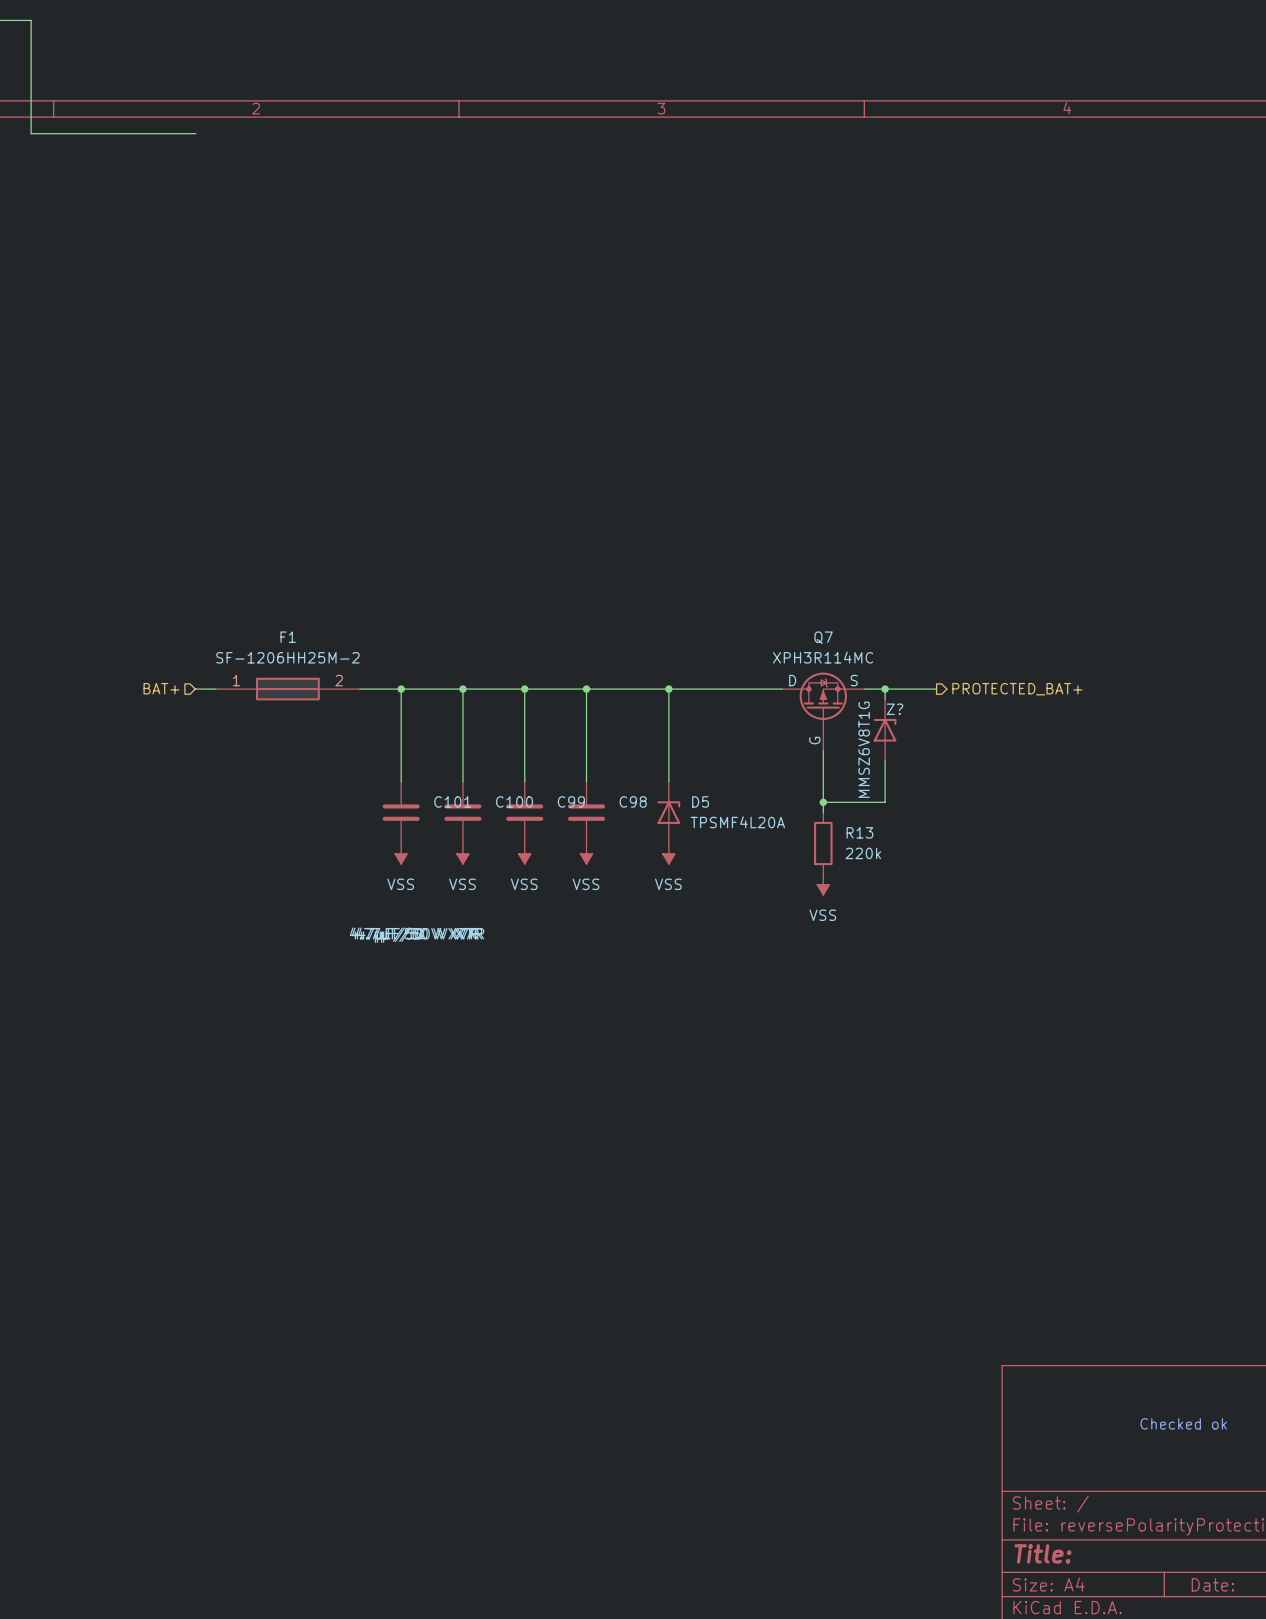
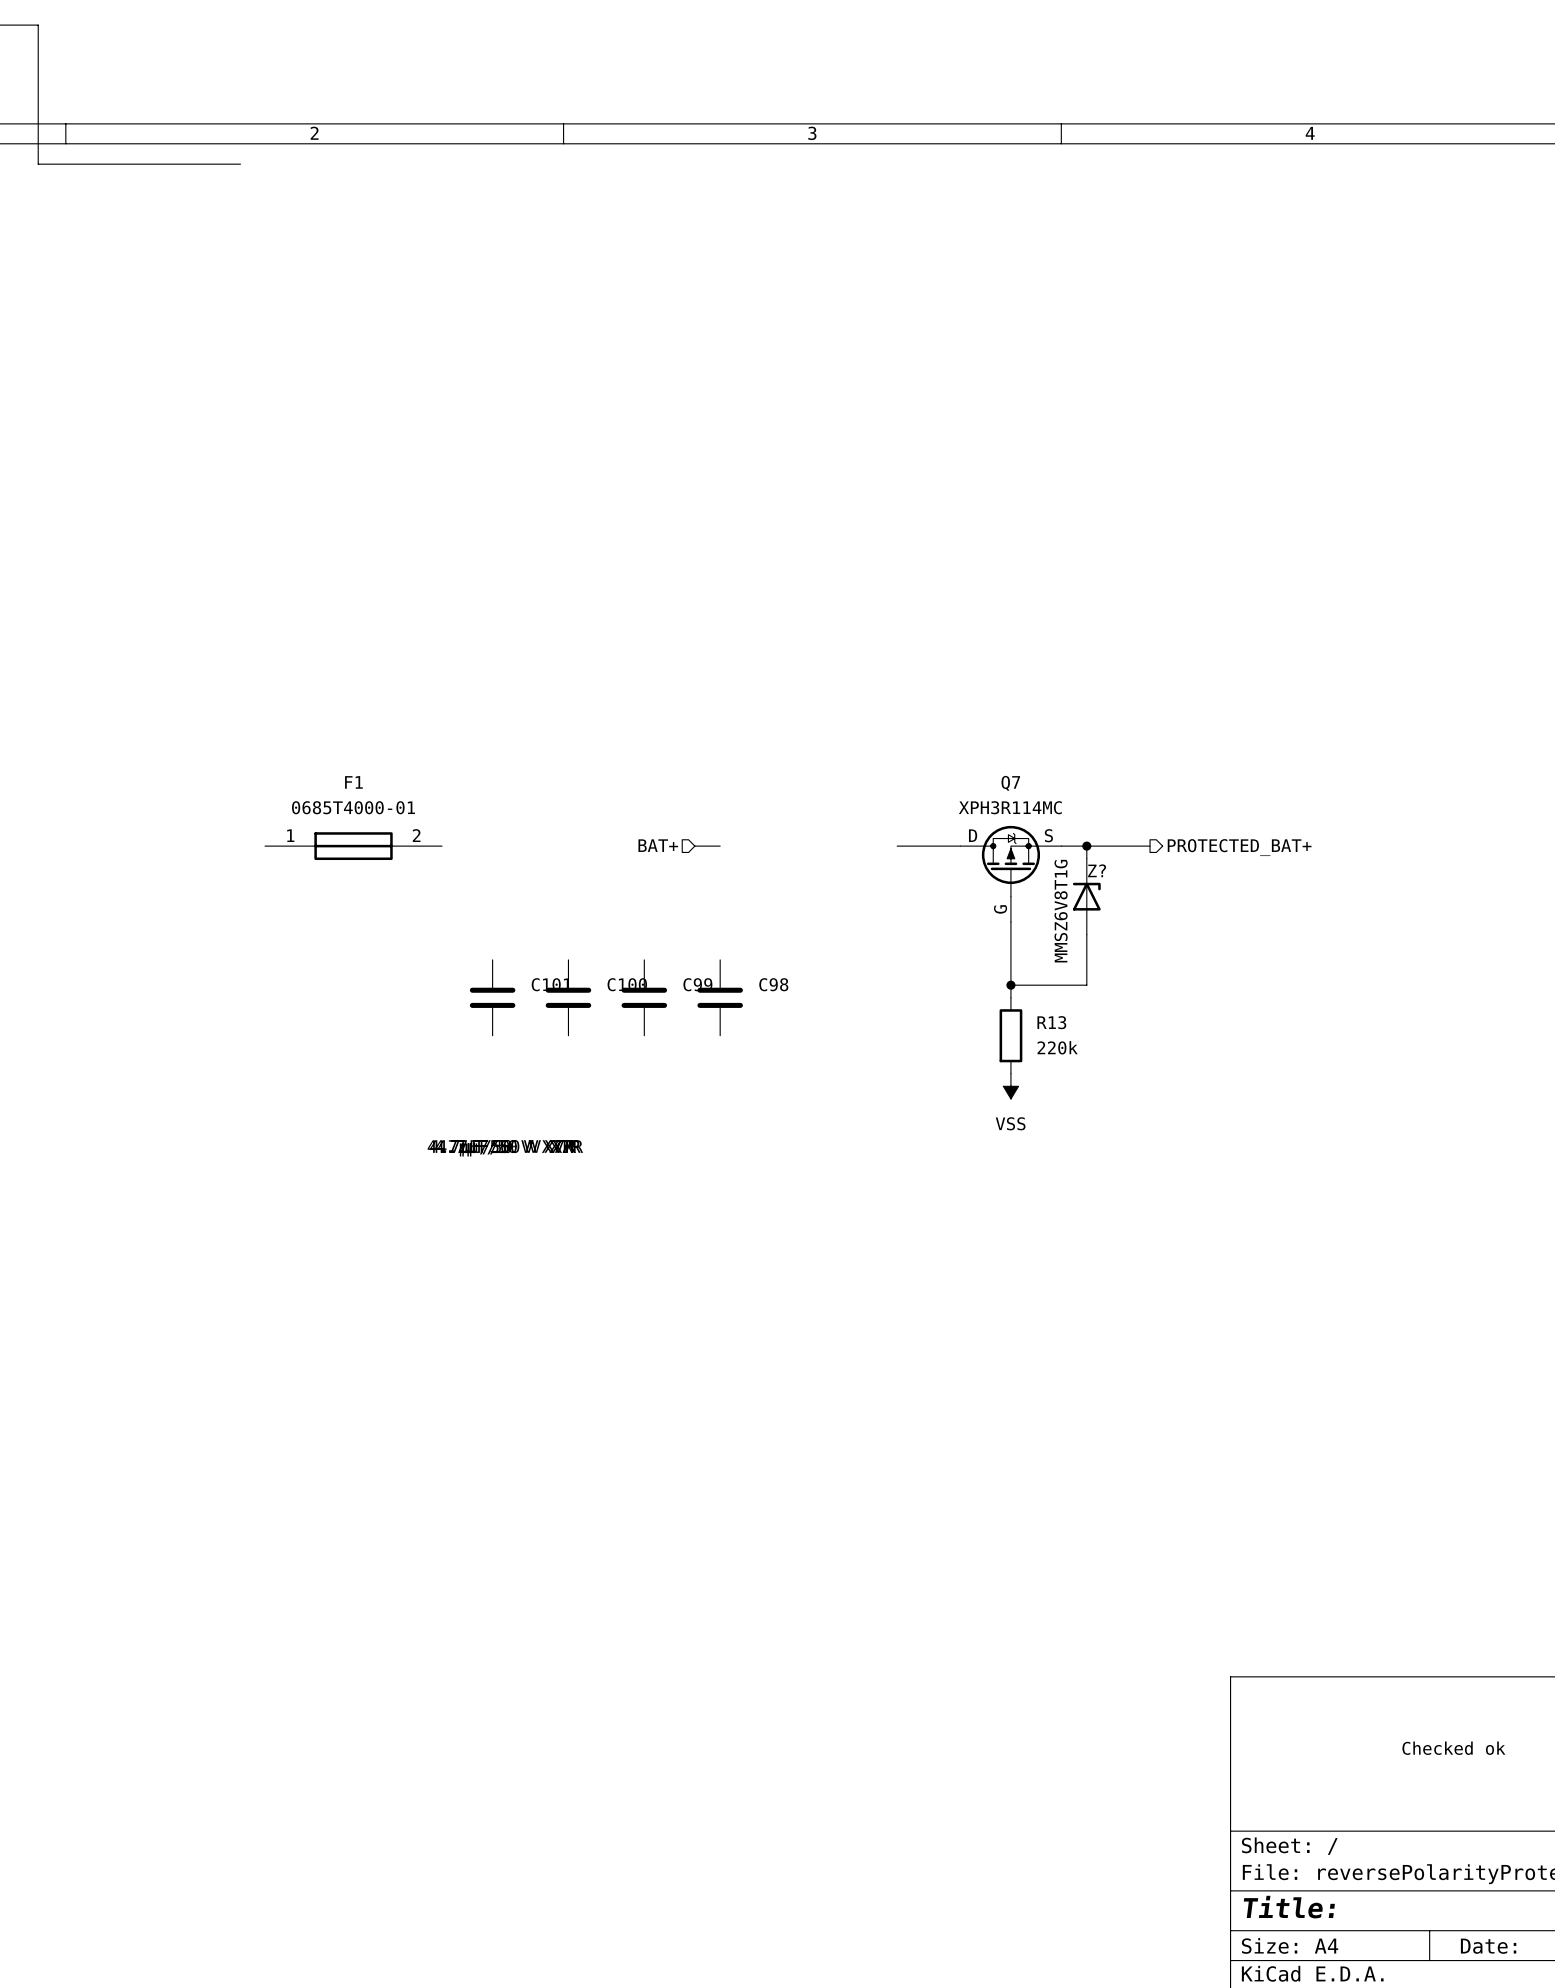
F1 value: SF-1206HH25M-2 (287, 657) -> 0685T4000-01 (353, 807)
hierarchical label: BAT+ (161, 688) -> none
hierarchical label: none -> BAT+ (658, 845)
wire: (195, 689) (215, 689) -> none
wire: (359, 689) (565, 689) -> none
wire: (401, 689) (401, 781) -> none
junction: (401, 689) -> none
wire: (462, 689) (462, 781) -> none
junction: (462, 689) -> none
wire: (524, 689) (524, 781) -> none
junction: (524, 689) -> none
junction: (586, 689) -> none
wire: (668, 689) (668, 781) -> none
junction: (668, 689) -> none
wire: (730, 689) (586, 689) (586, 781) -> none
D5: TPSMF4L20A (668, 812) -> none
power symbol: VSS (401, 853) -> none
power symbol: VSS (462, 853) -> none
power symbol: VSS (524, 853) -> none
power symbol: VSS (586, 853) -> none
power symbol: VSS (668, 853) -> none

